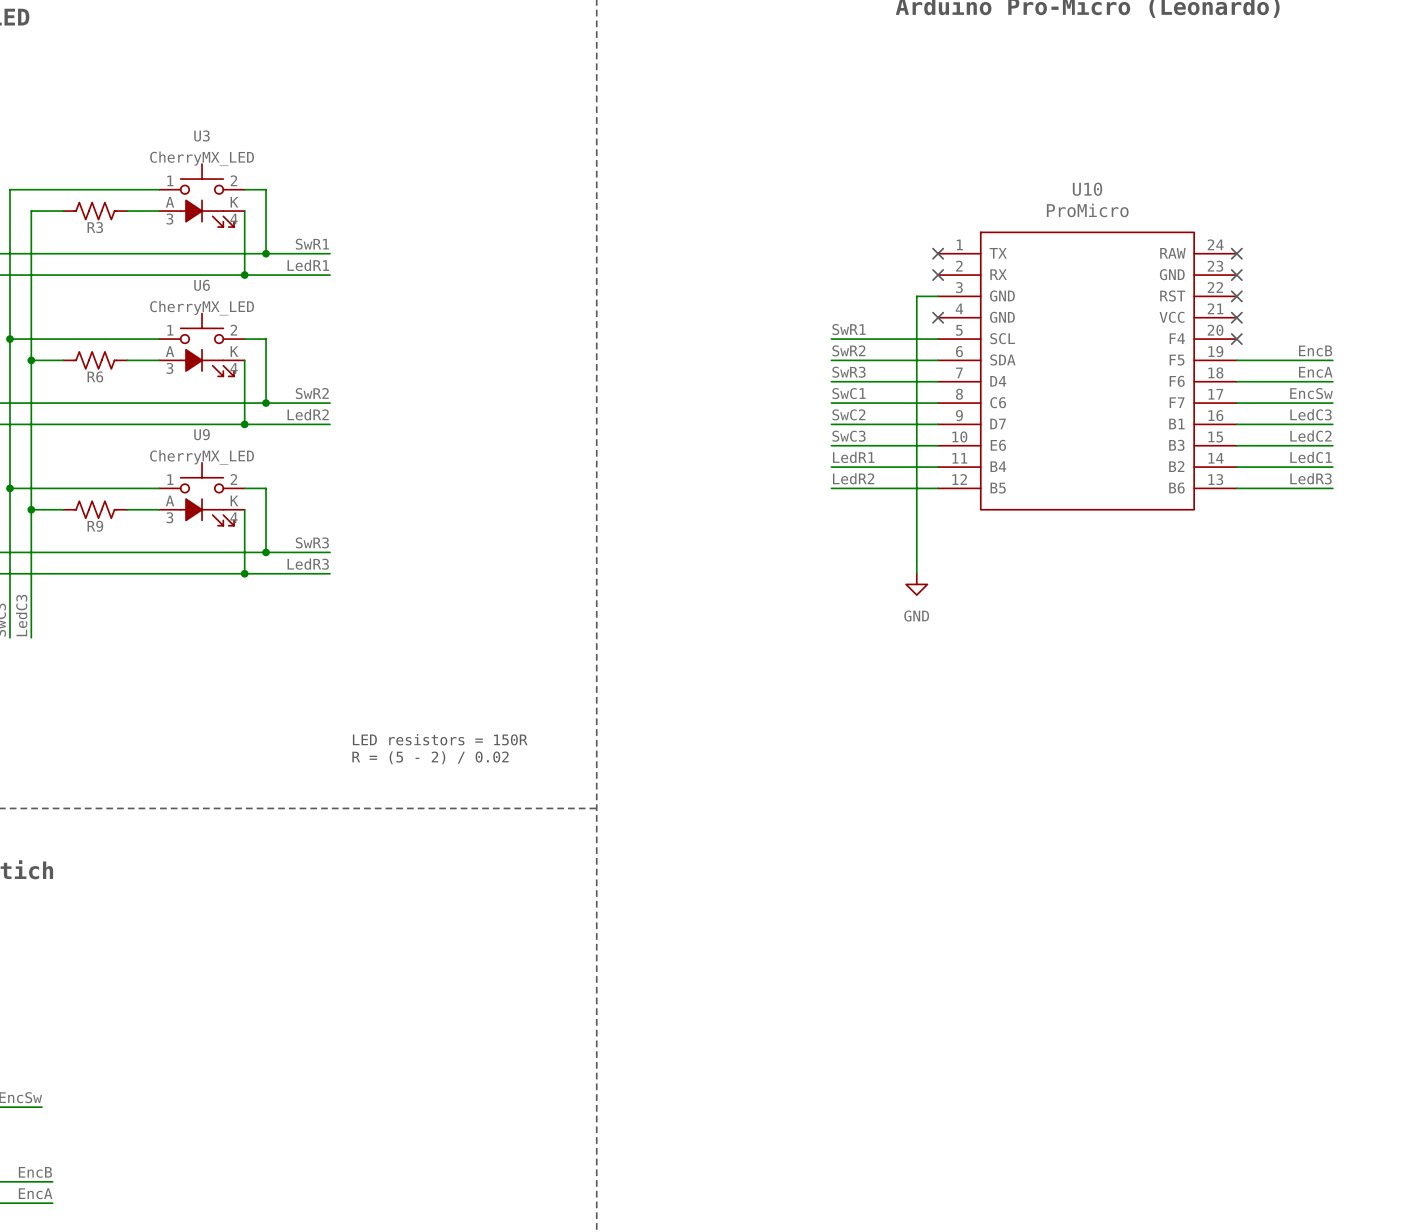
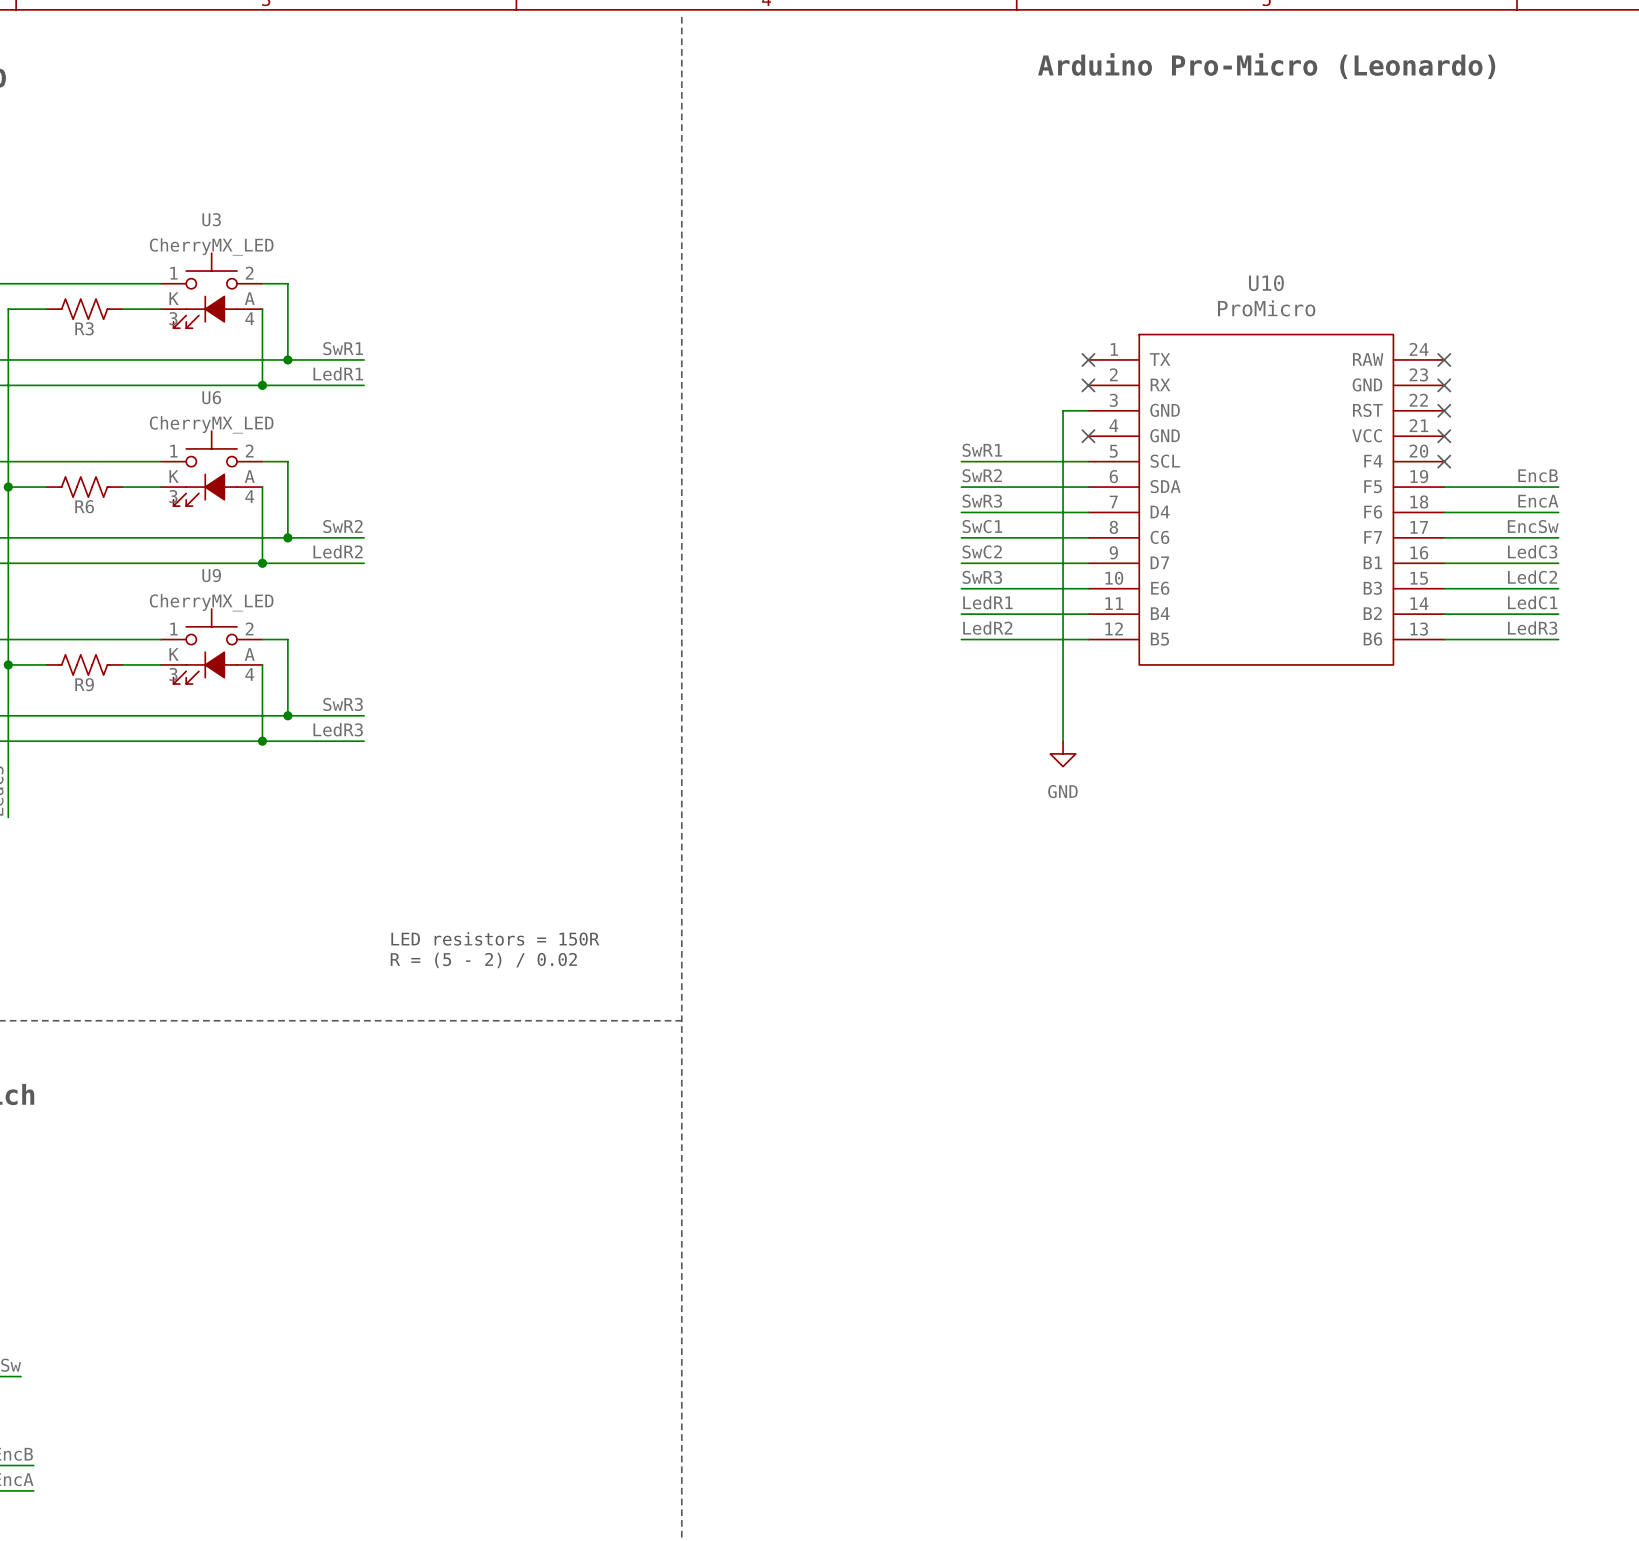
U3 symbol: [159, 164, 245, 228] -> [160, 253, 263, 329]
U6 symbol: [159, 313, 245, 377] -> [160, 431, 263, 507]
label: SwC3 (848, 436) -> SwR3 (982, 577)
U9 symbol: [159, 462, 245, 526] -> [160, 609, 263, 685]

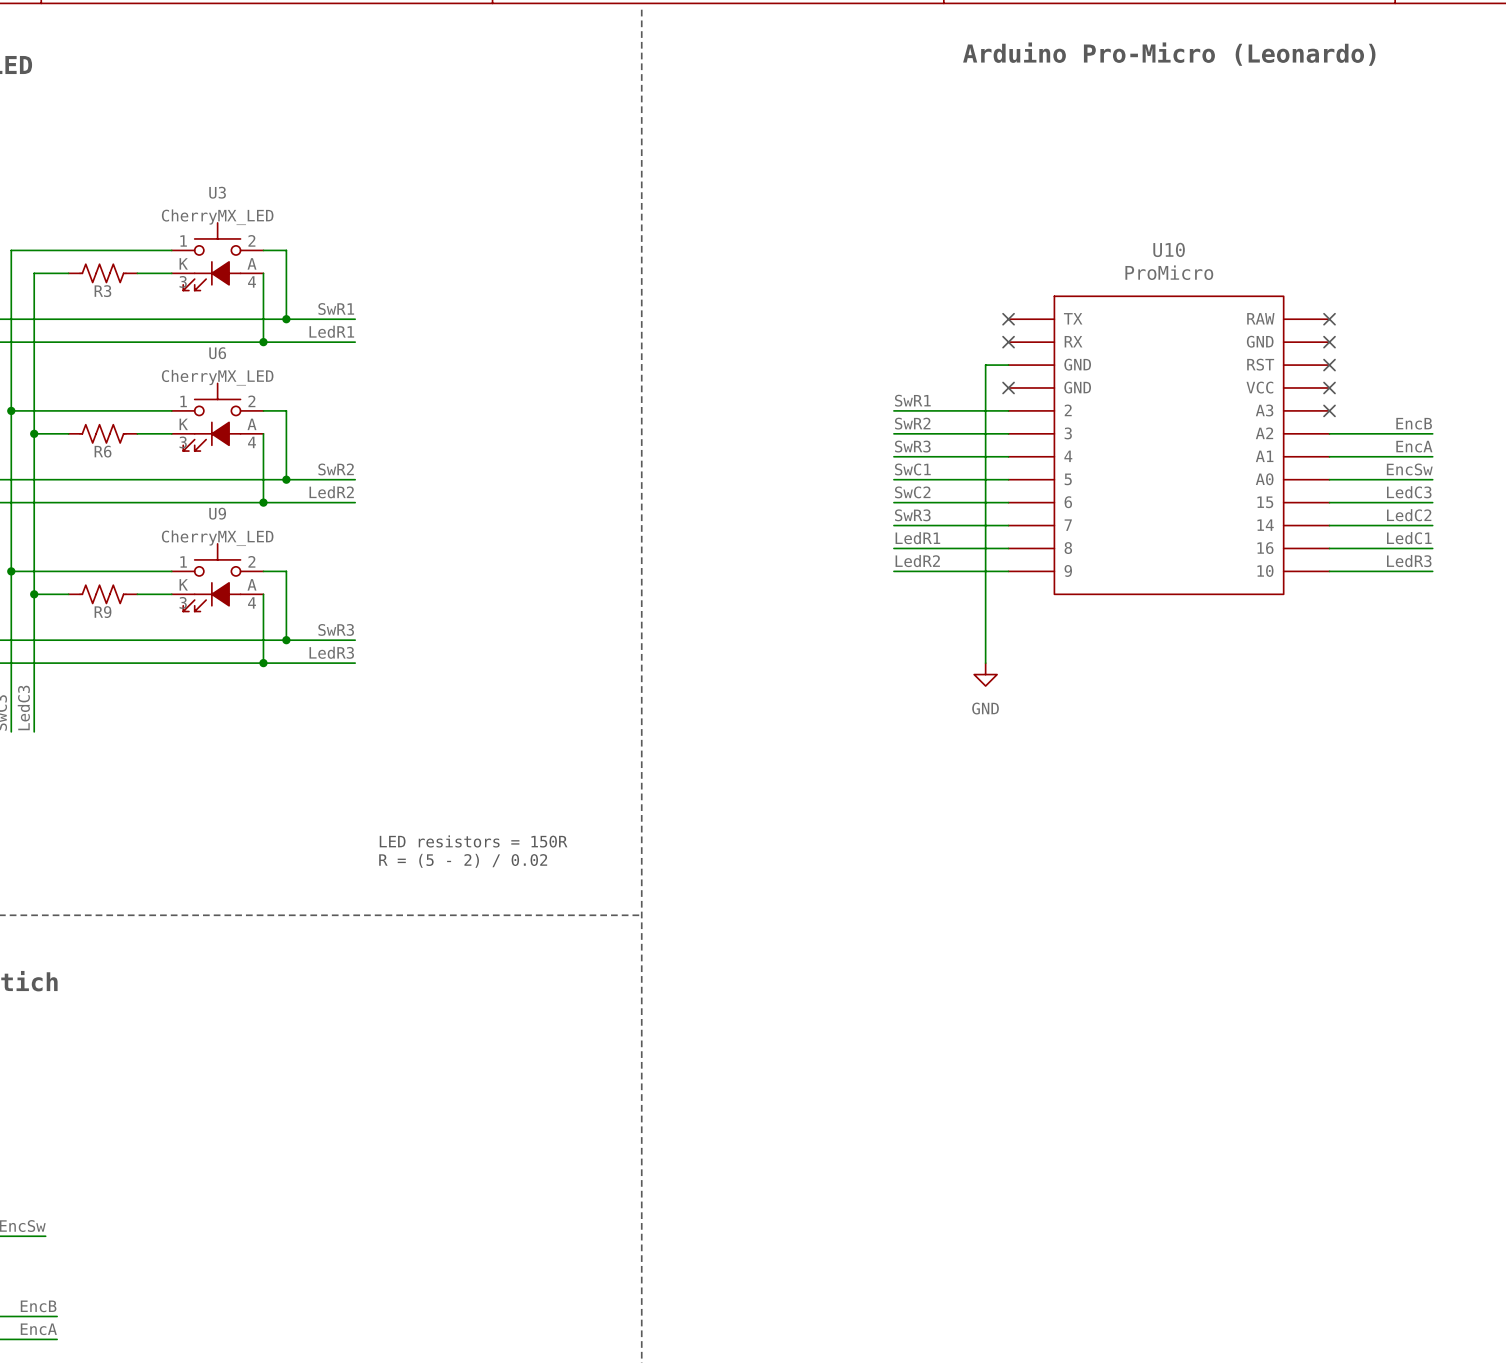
U10 symbol: [1088, 334, 1445, 665] -> [1008, 296, 1330, 595]

